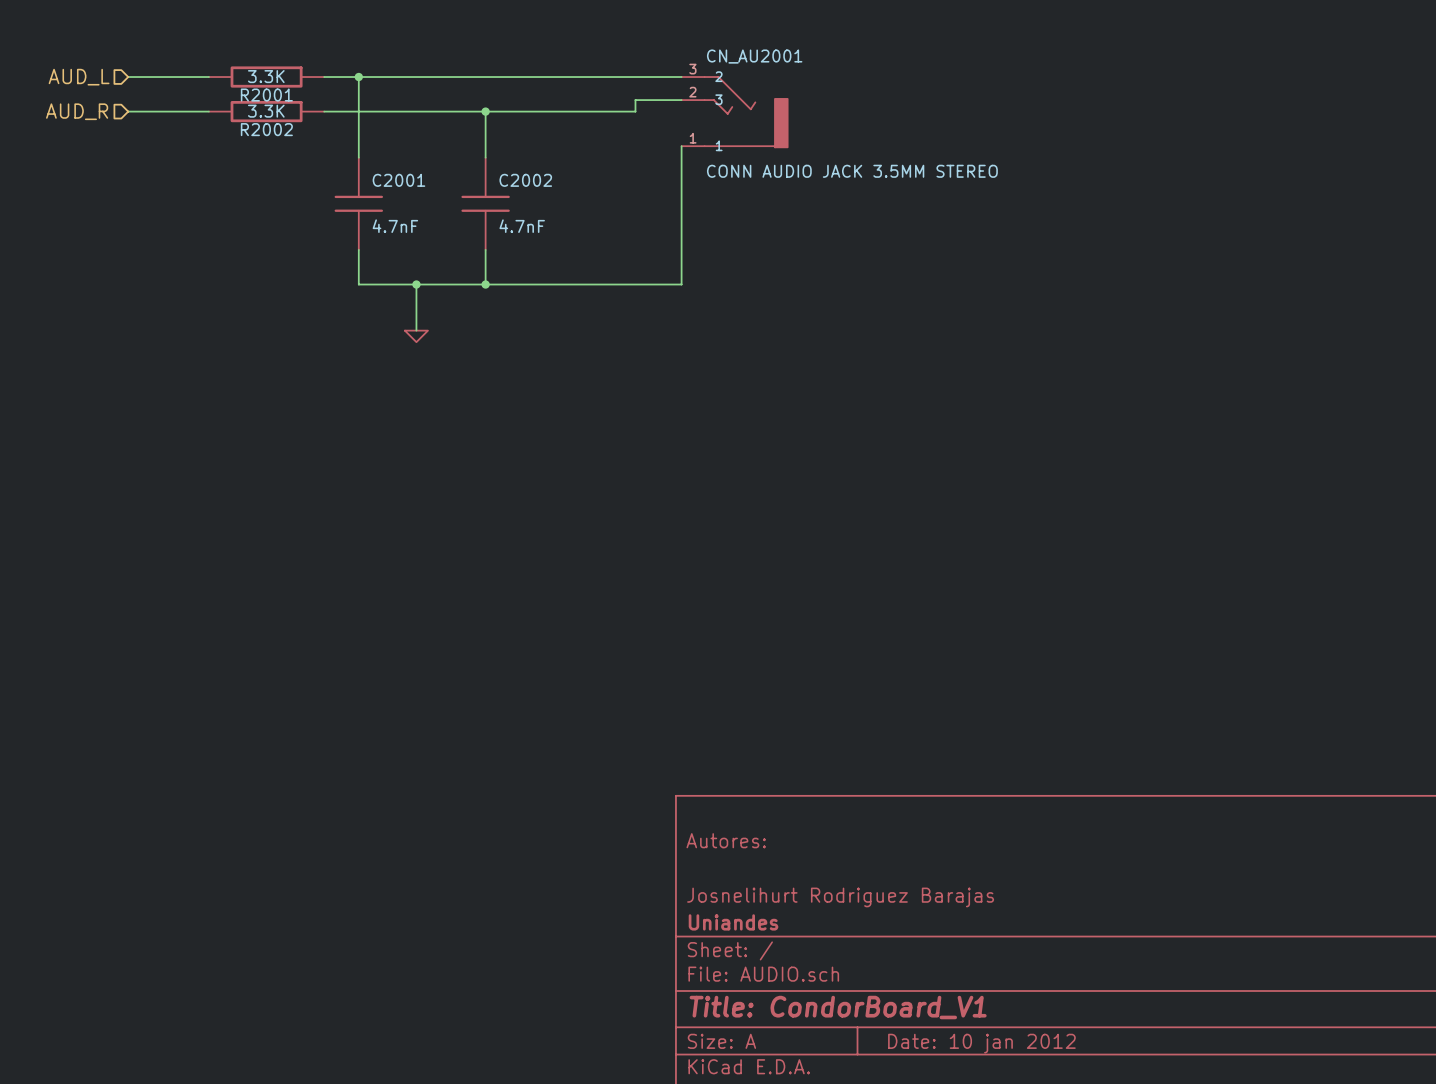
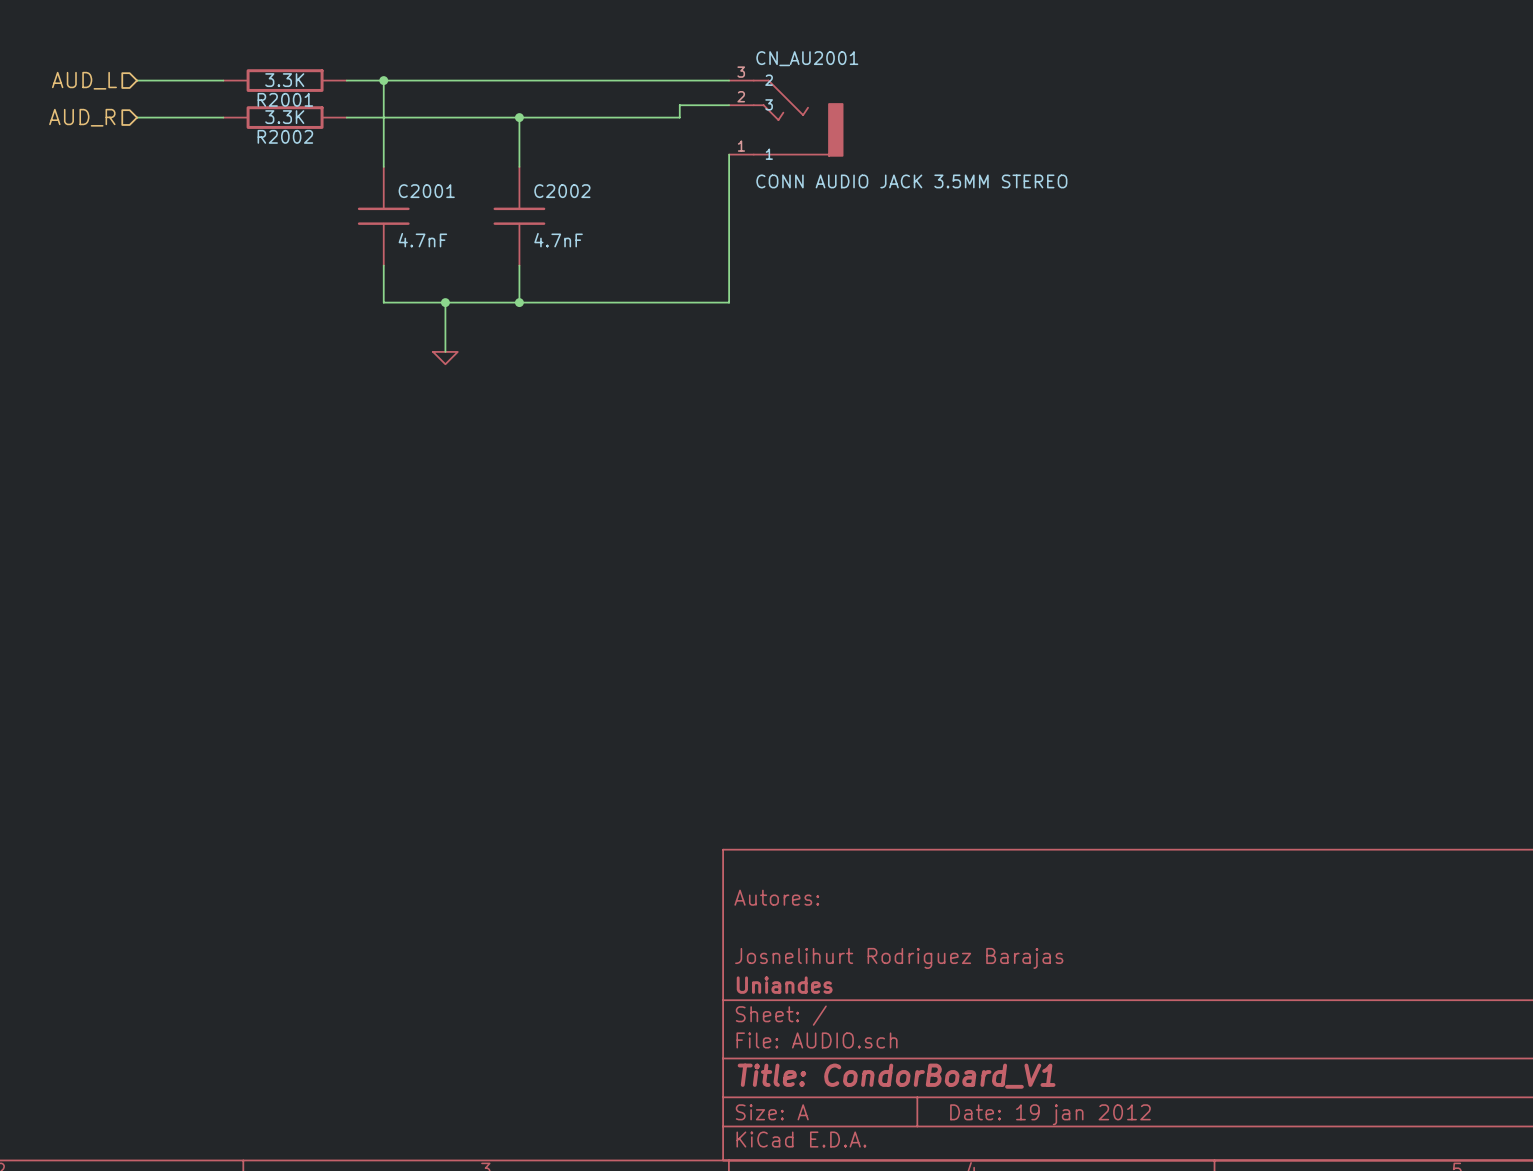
title block: Date: 10 jan 2012 (981, 1043) -> Date: 19 jan 2012 (1050, 1114)

